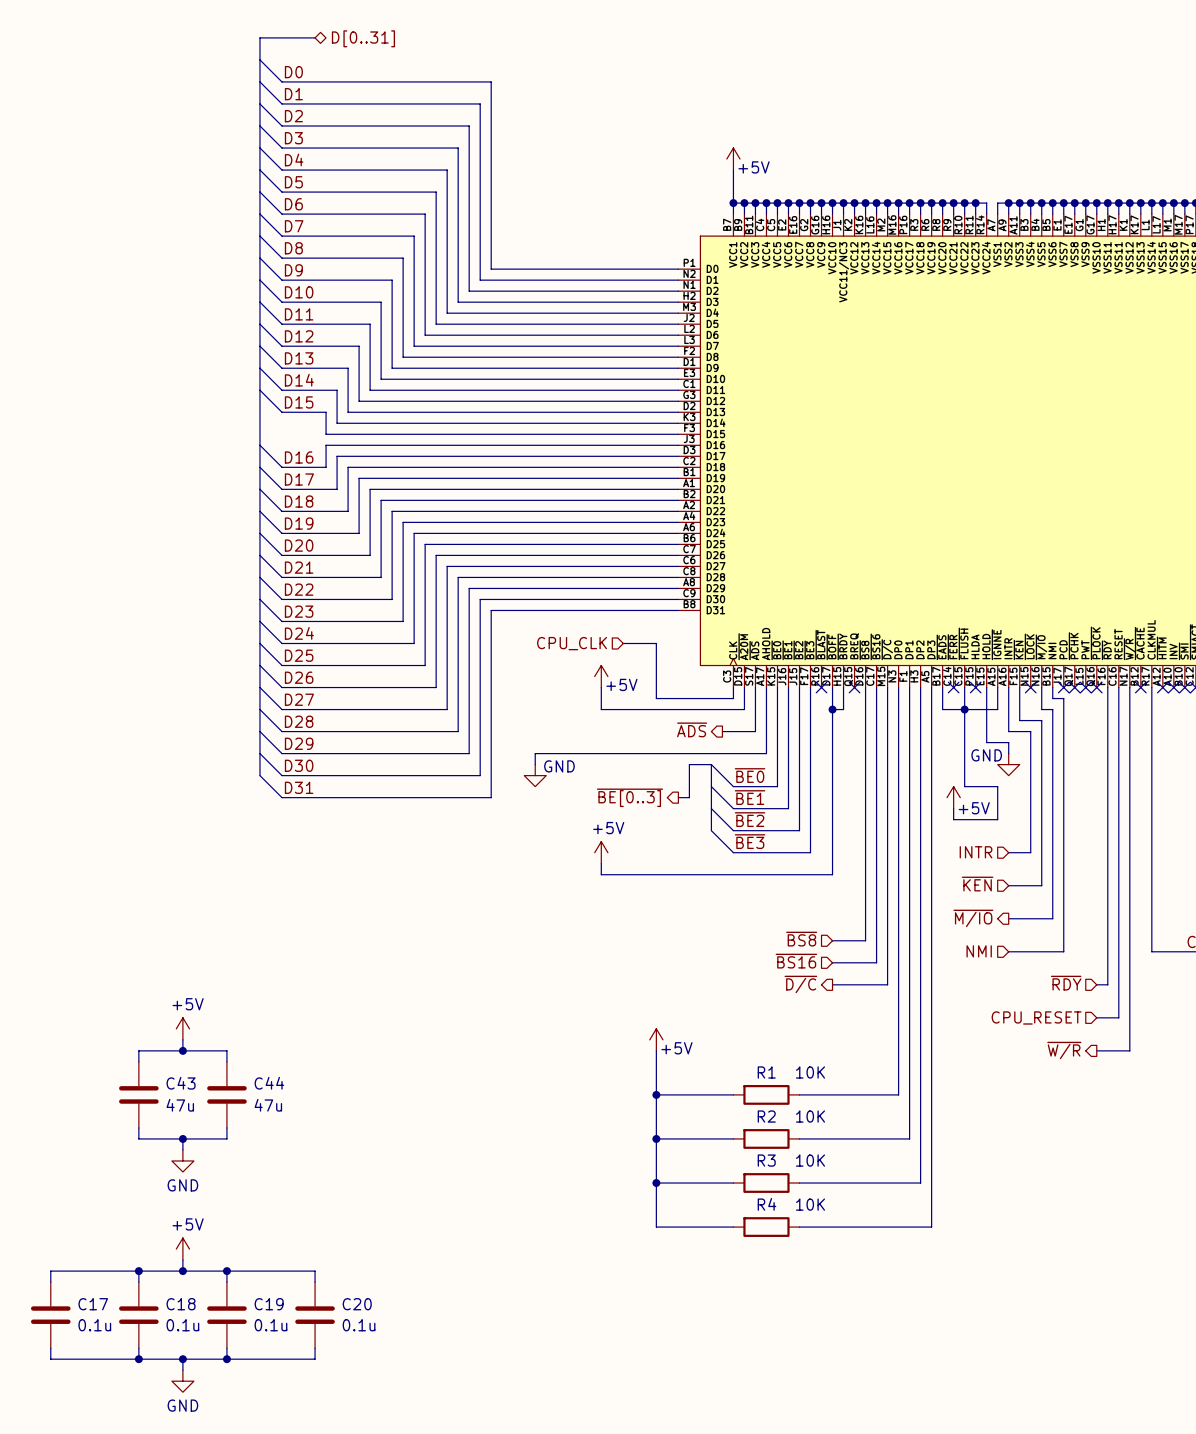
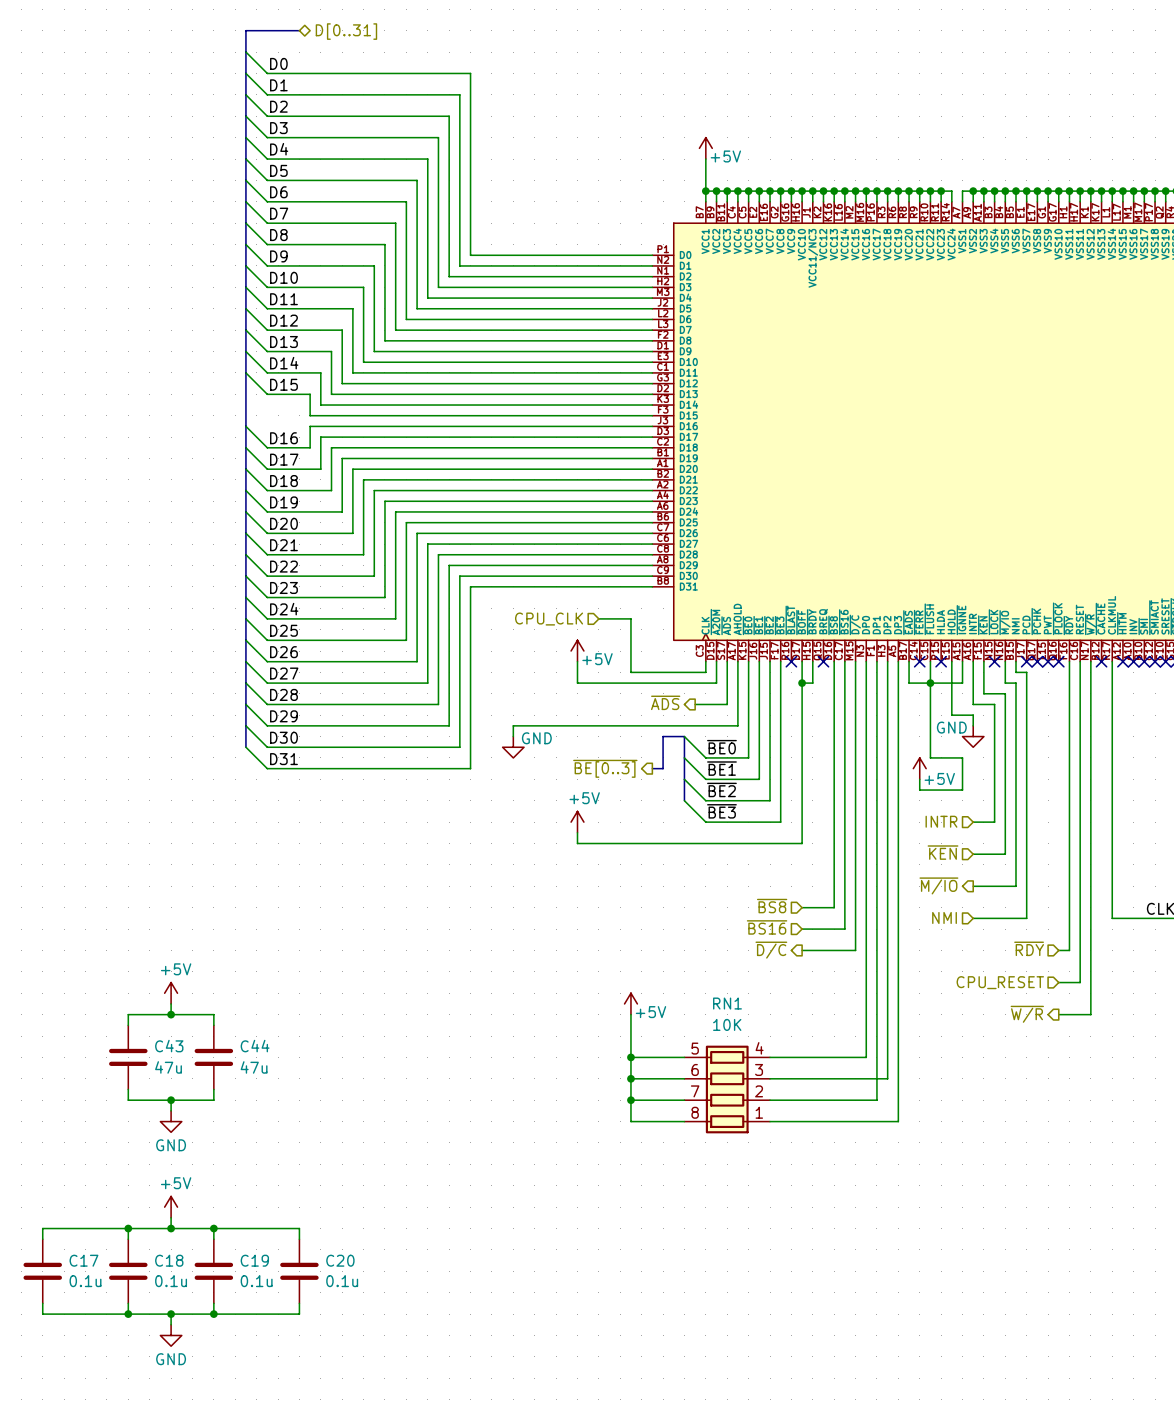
R1: 10K (766, 1094) -> none
wire: none -> (630, 1078) (684, 1078)
junction: none -> (630, 1078)
wire: (920, 1116) (920, 1183) (799, 1183) -> (887, 1078) (770, 1078)
RN1: none -> 10K (727, 1089)
R2: 10K (766, 1138) -> none
wire: (656, 1160) (656, 1227) (733, 1227) -> (630, 1121) (684, 1121)
wire: (931, 1160) (931, 1227) (799, 1227) -> (898, 1121) (770, 1121)
wire: (656, 1183) (733, 1183) -> none
junction: (656, 1183) -> none
R3: 10K (766, 1183) -> none
R4: 10K (766, 1227) -> none

